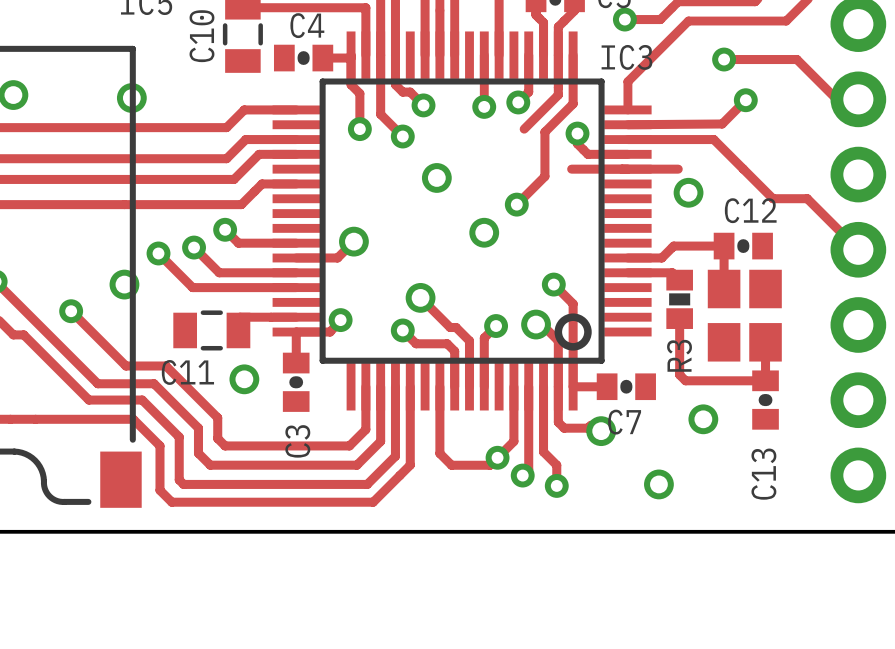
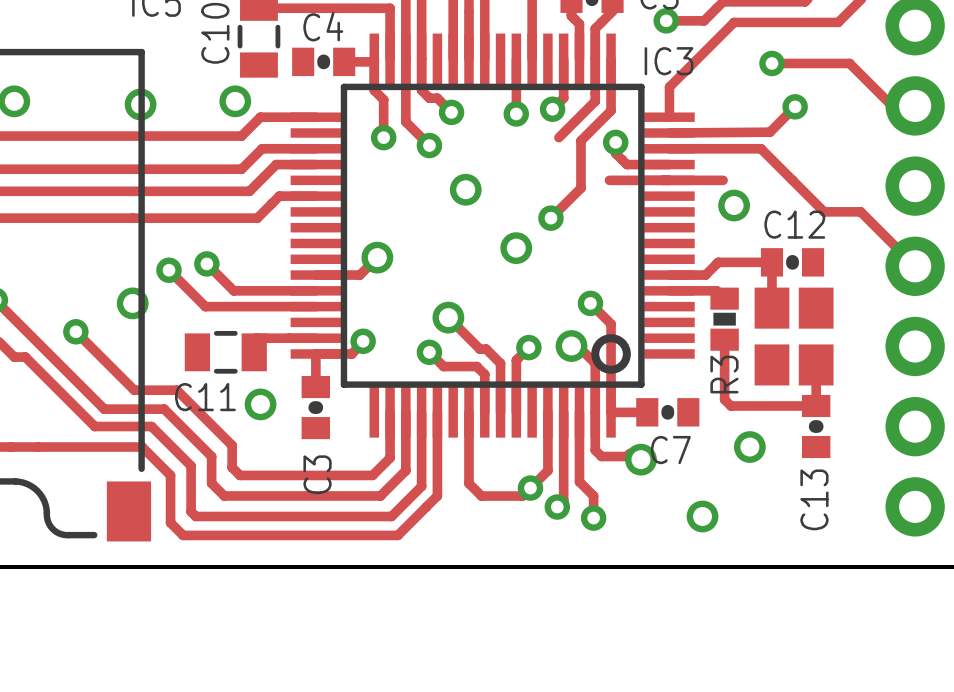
via: none -> (235, 101)
track: (225, 229) (238, 243) (296, 243) -> none
via: (225, 229) -> none

